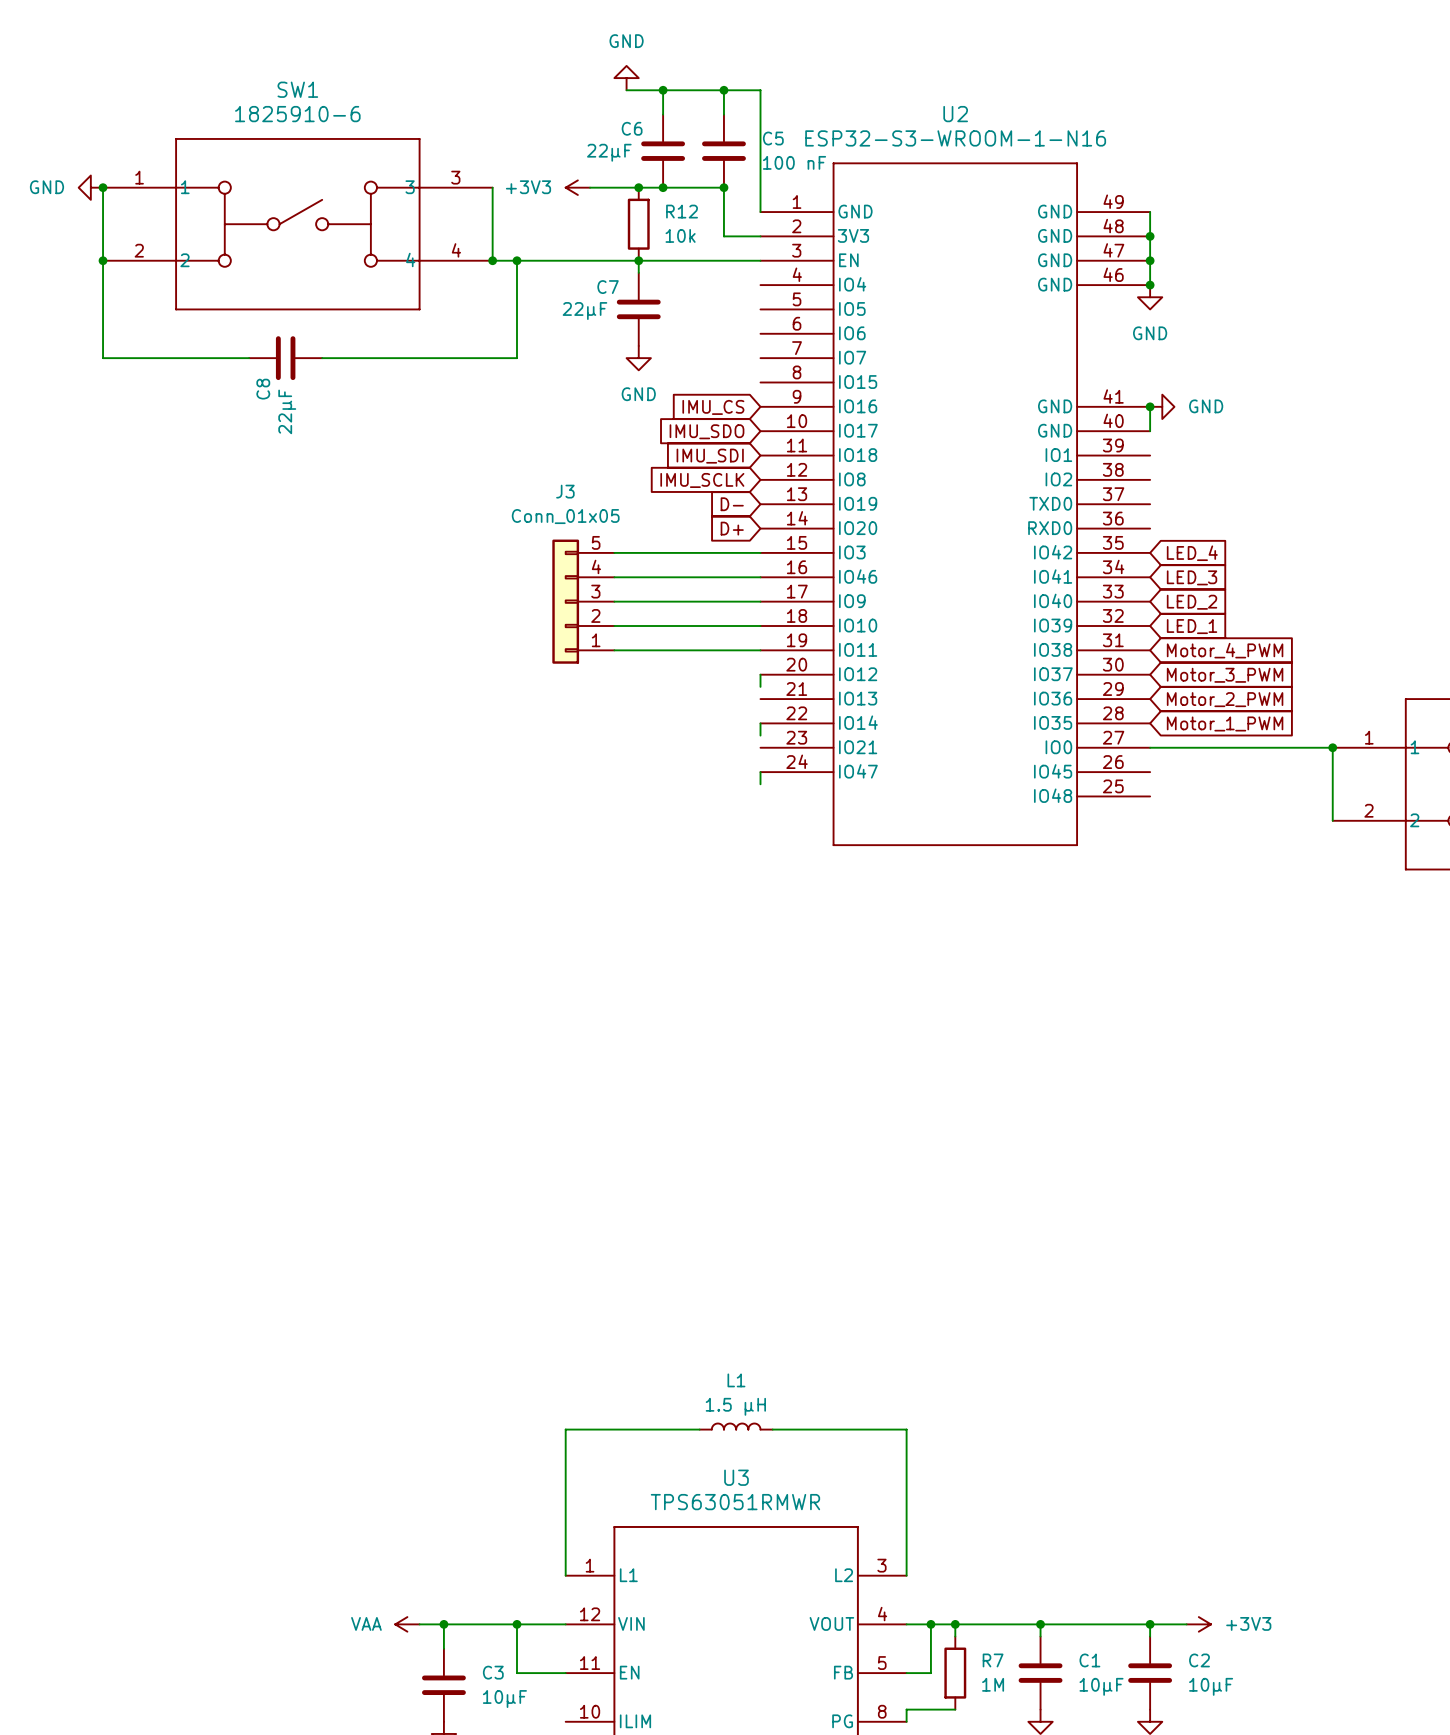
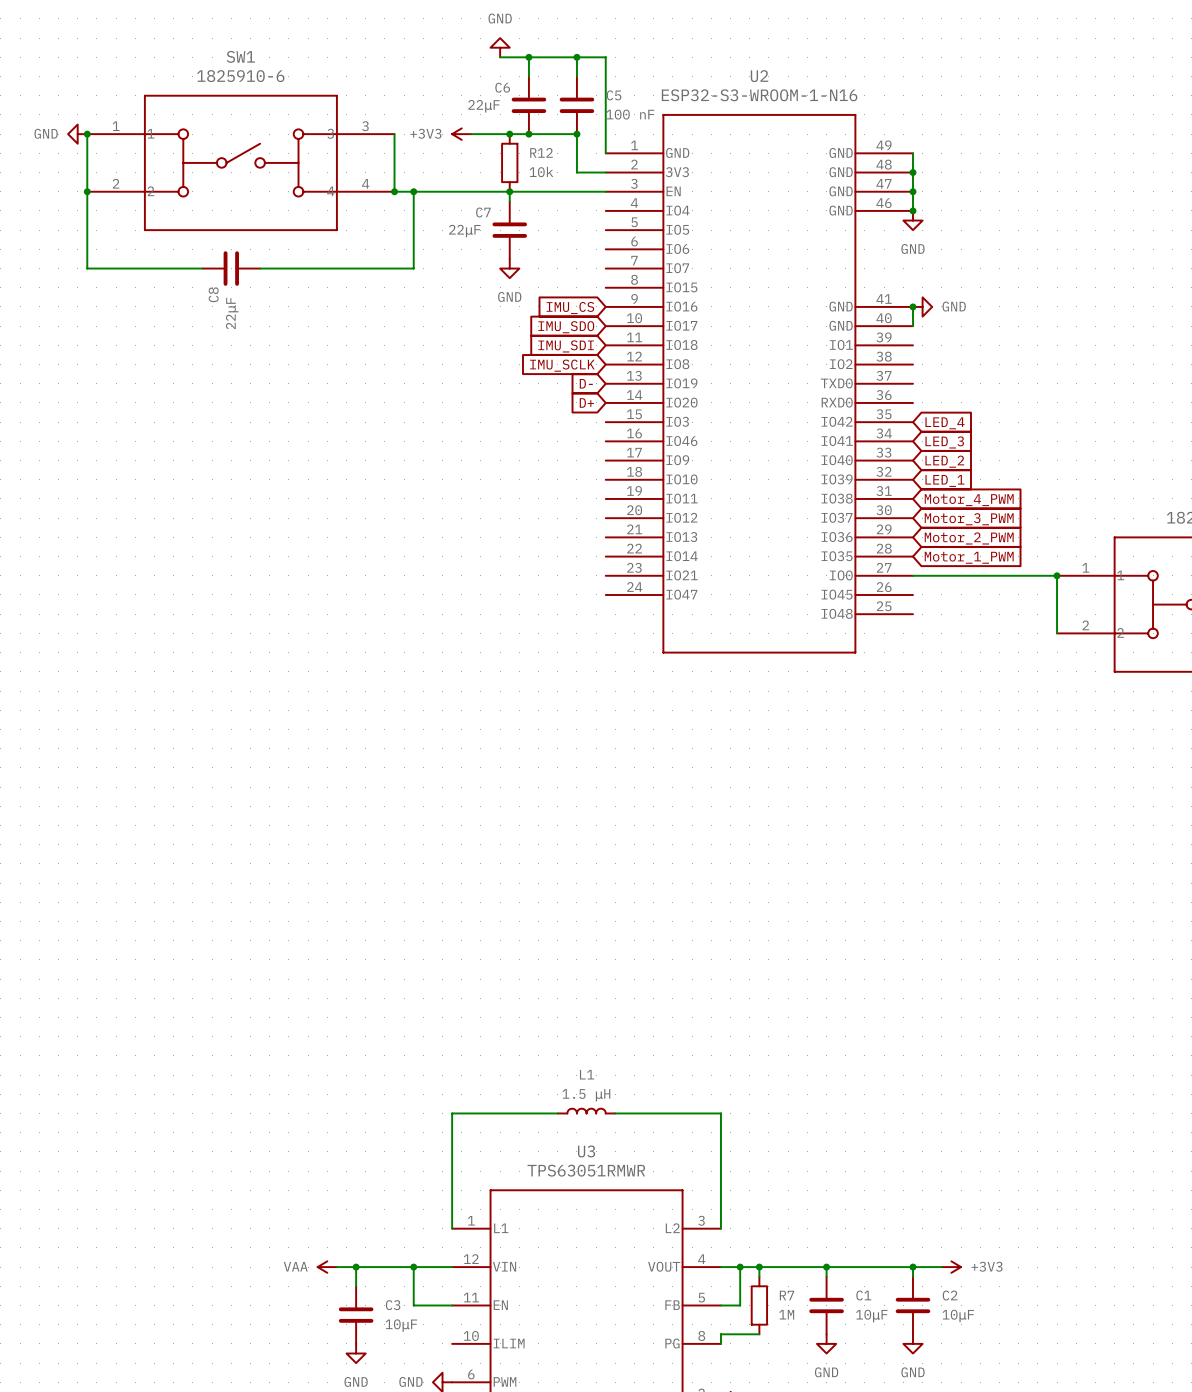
wire: (614, 552) (760, 552) -> none
wire: (614, 577) (760, 577) -> none
J3: Conn_01x05 (583, 601) -> none
wire: (614, 601) (760, 601) -> none
wire: (614, 626) (760, 626) -> none
wire: (614, 650) (760, 650) -> none
wire: (760, 674) (760, 686) -> none
wire: (760, 723) (760, 735) -> none
wire: (760, 772) (760, 784) -> none

